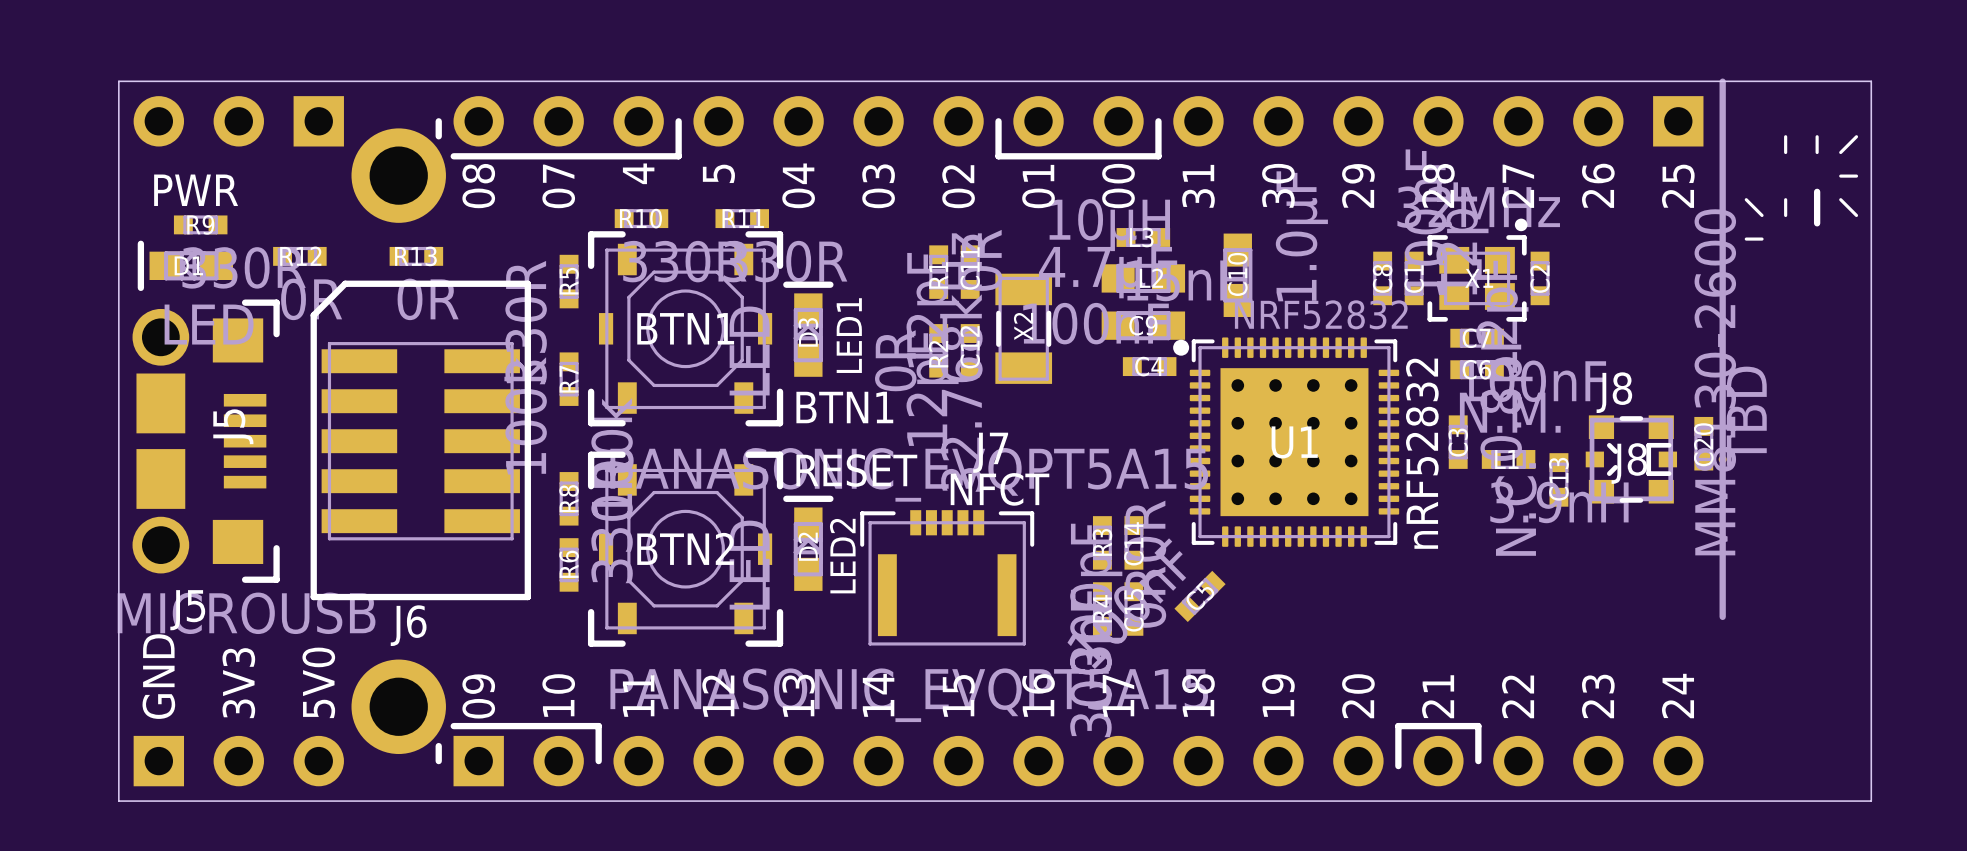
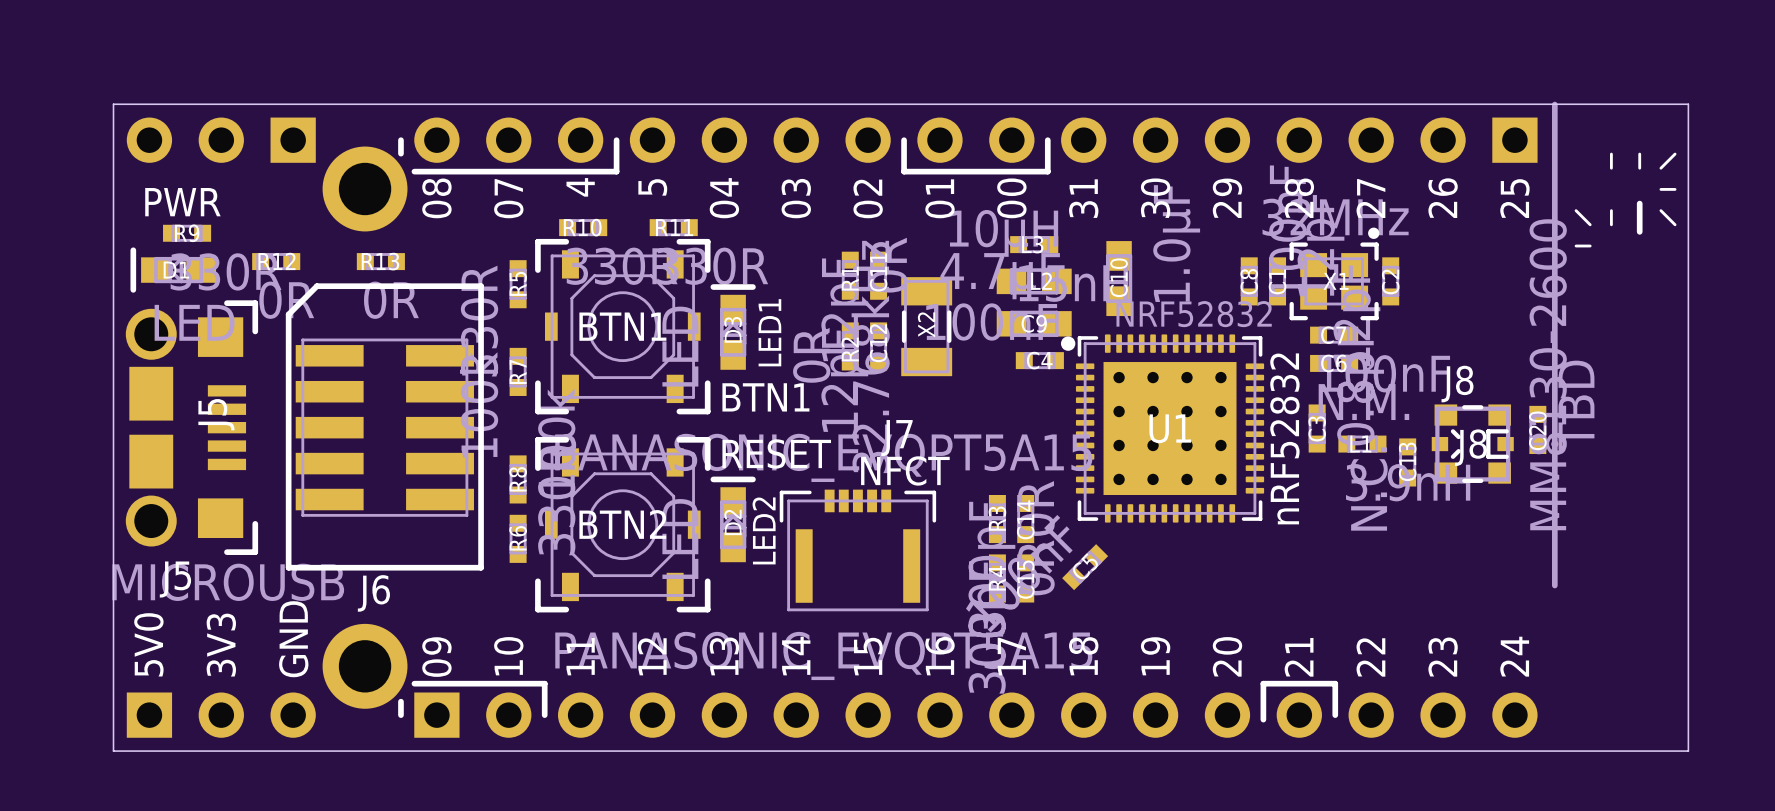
text: GND (158, 676) -> 5V0 (148, 644)
text: 5V0 (318, 682) -> GND (293, 639)

